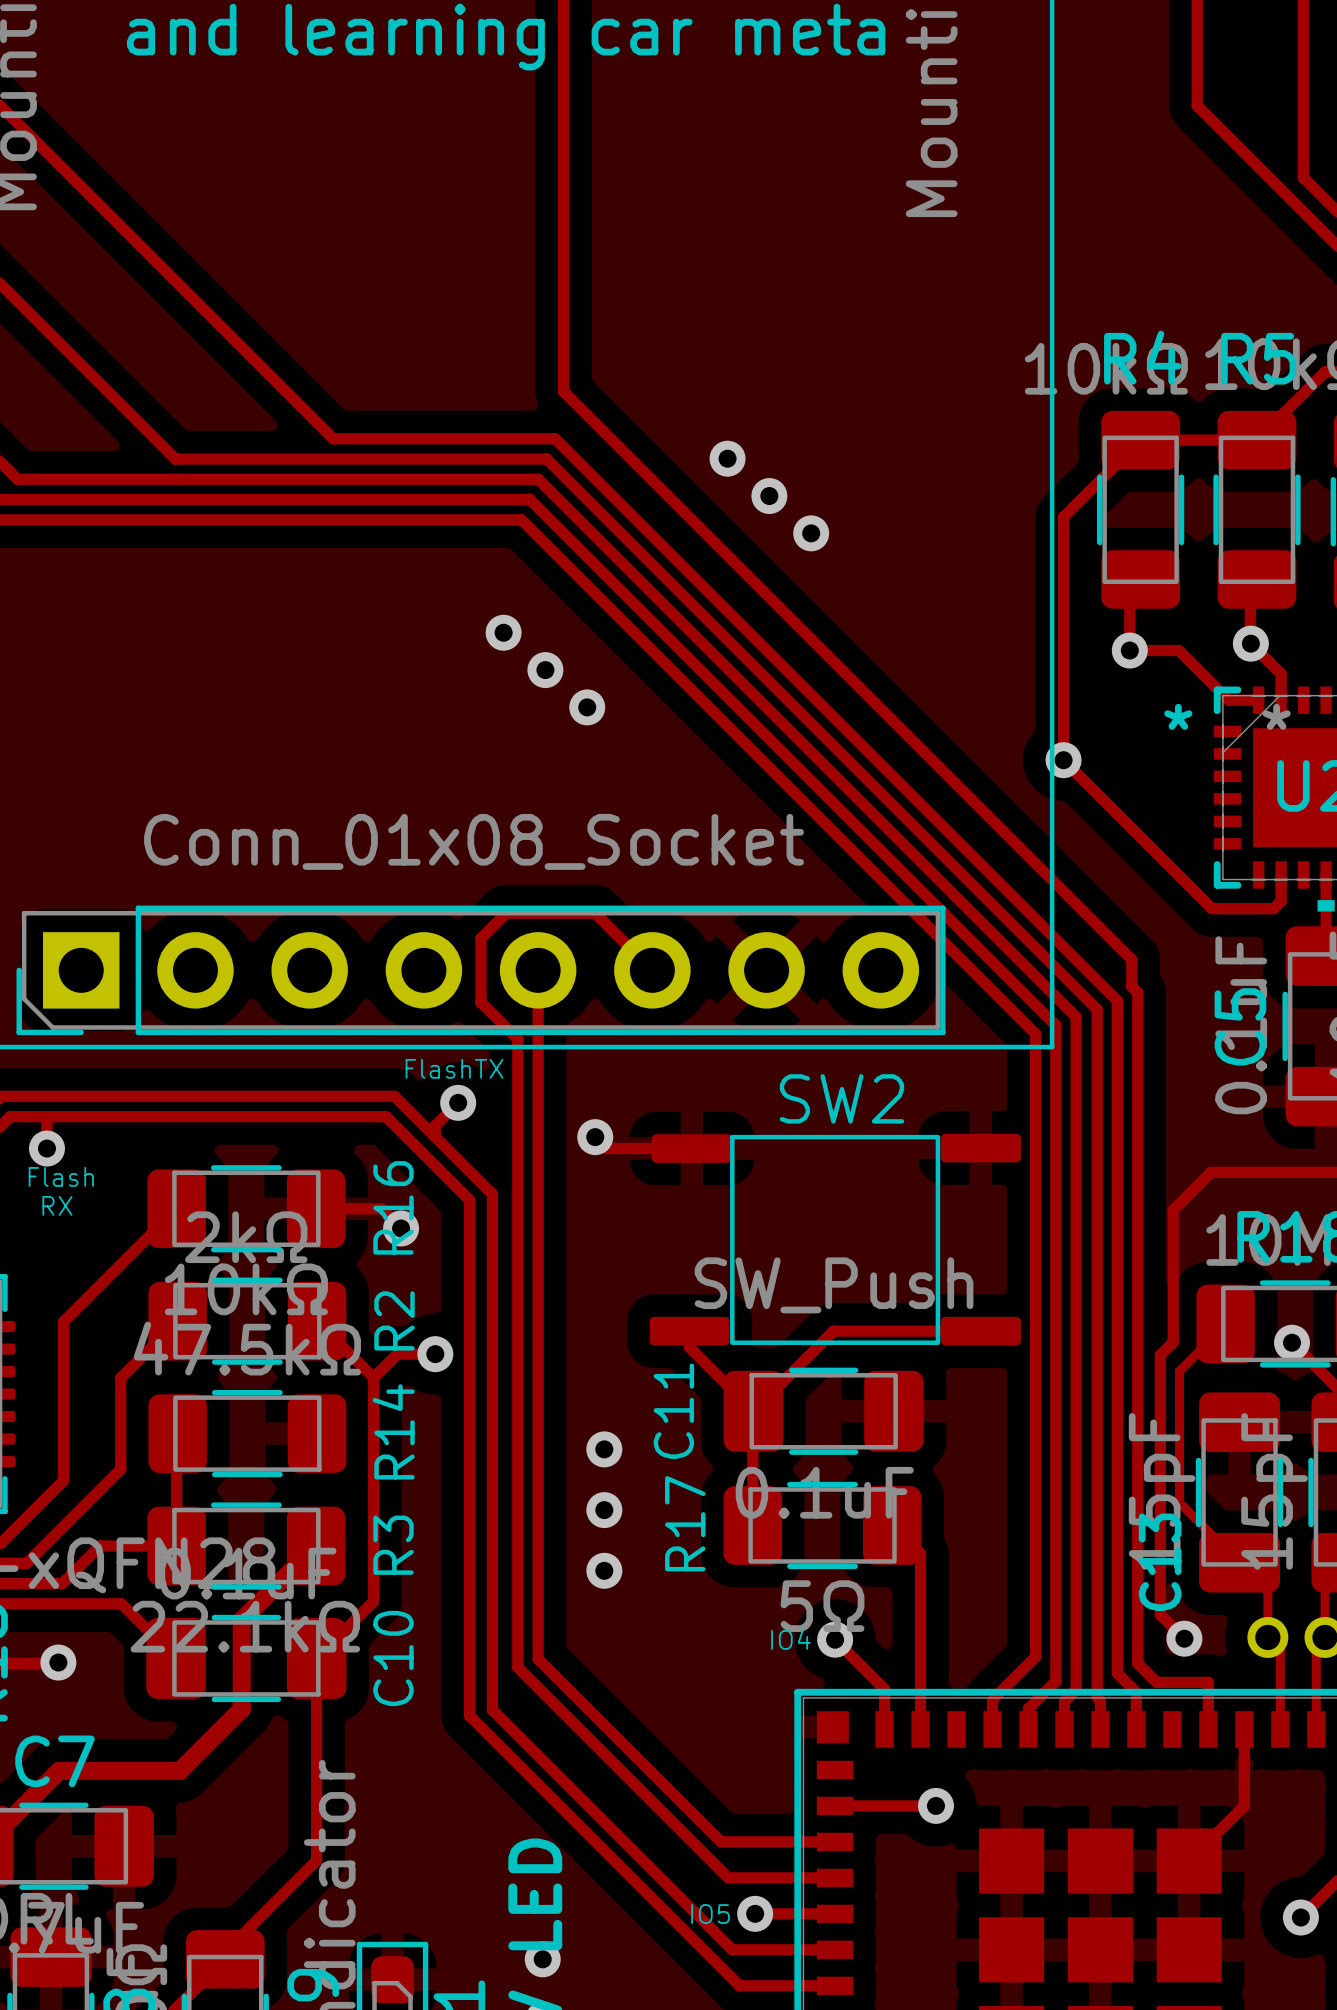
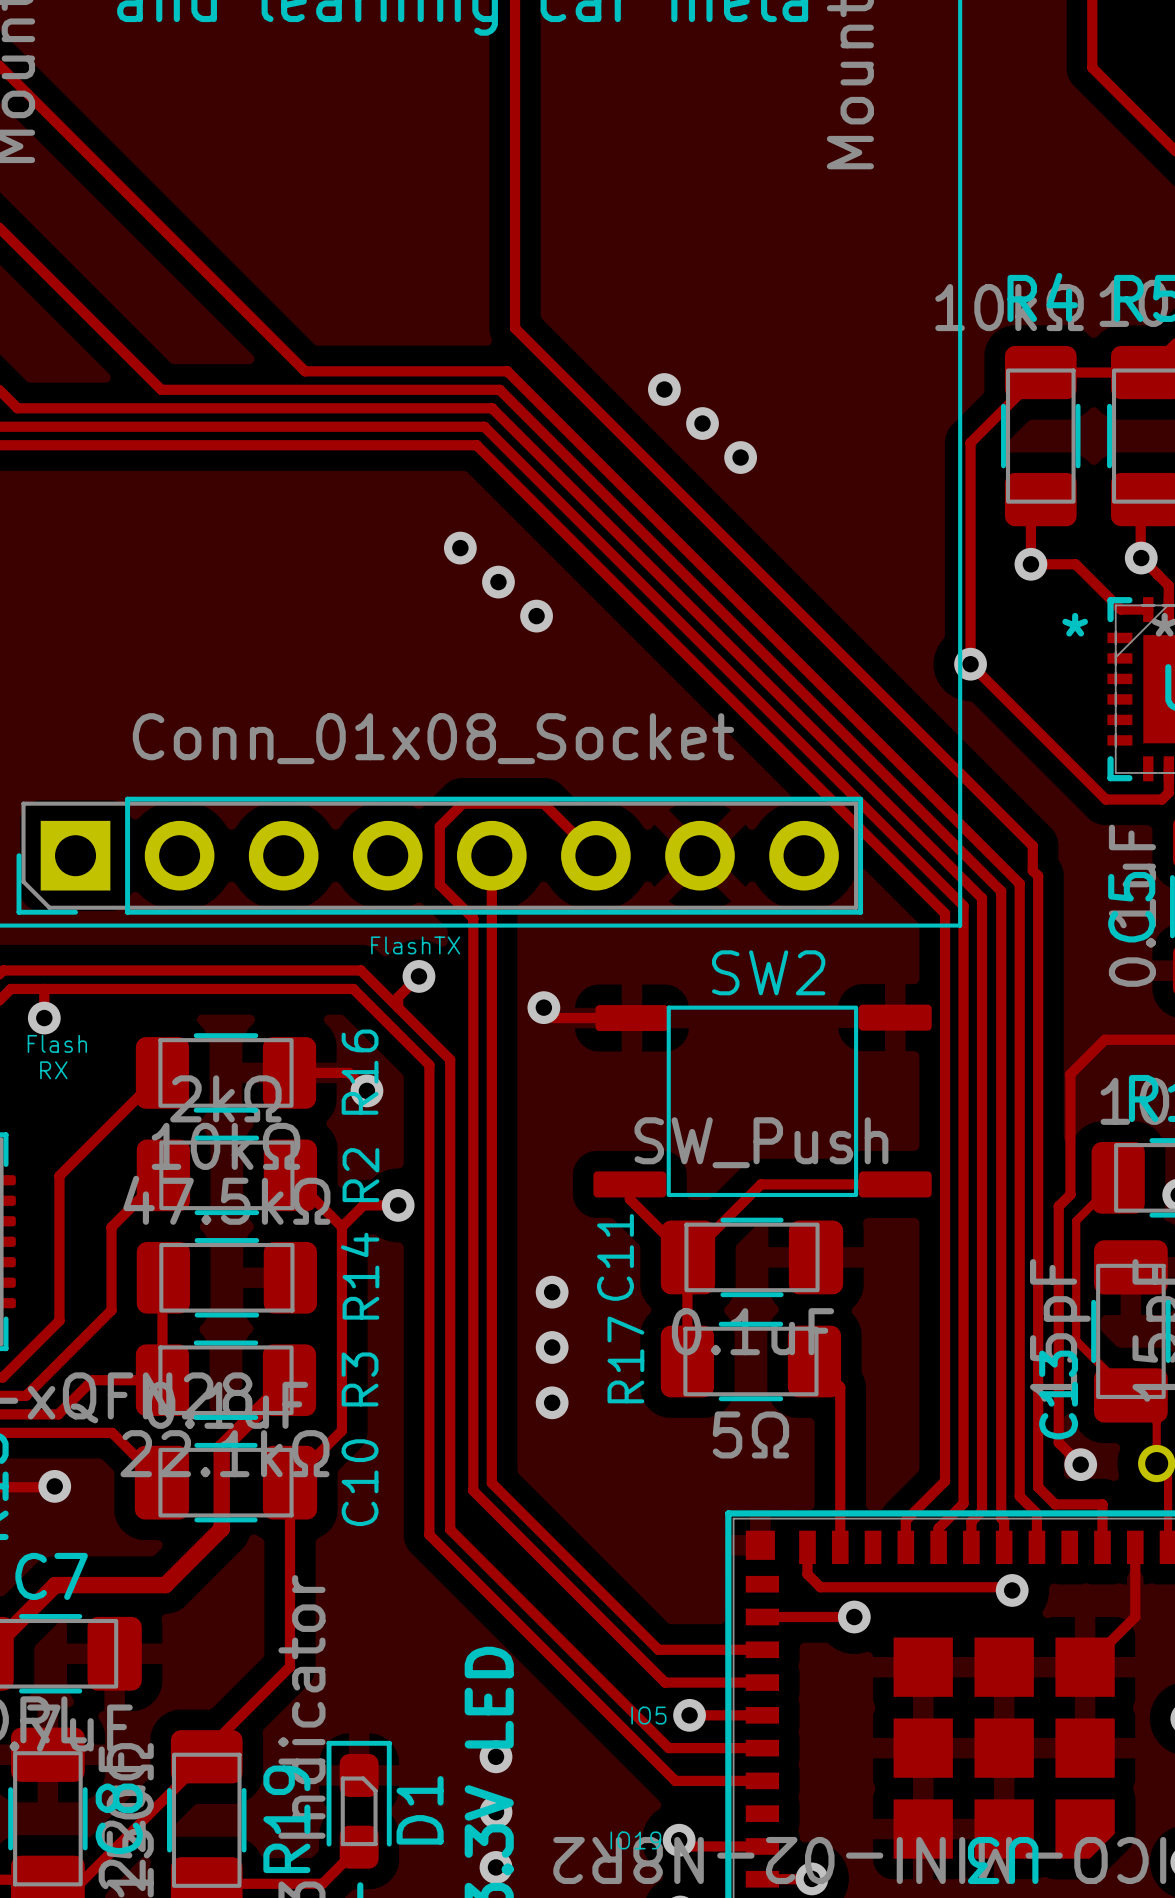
text: IO4 (790, 1639) -> none
track: (835, 1639) (884, 1689) (884, 1729) -> (1012, 1590) (1009, 1587) (820, 1587) (807, 1574) (807, 1547)
via: (835, 1639) -> none
via: none -> (1012, 1590)

